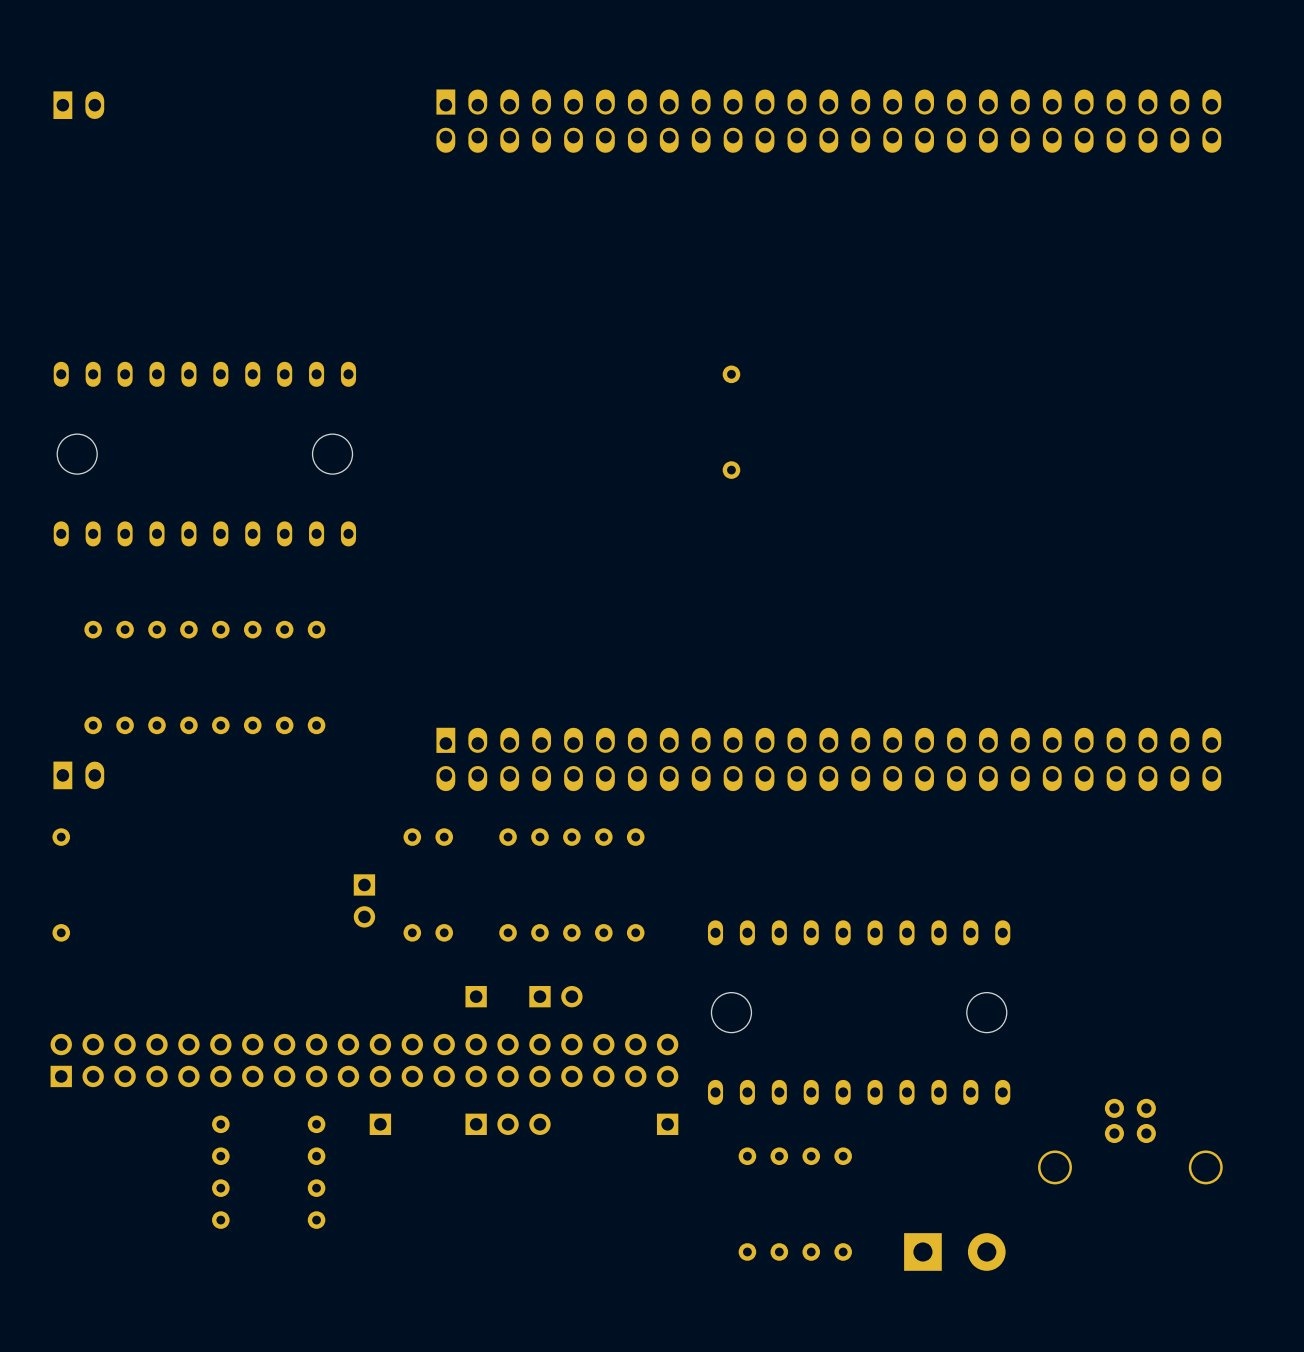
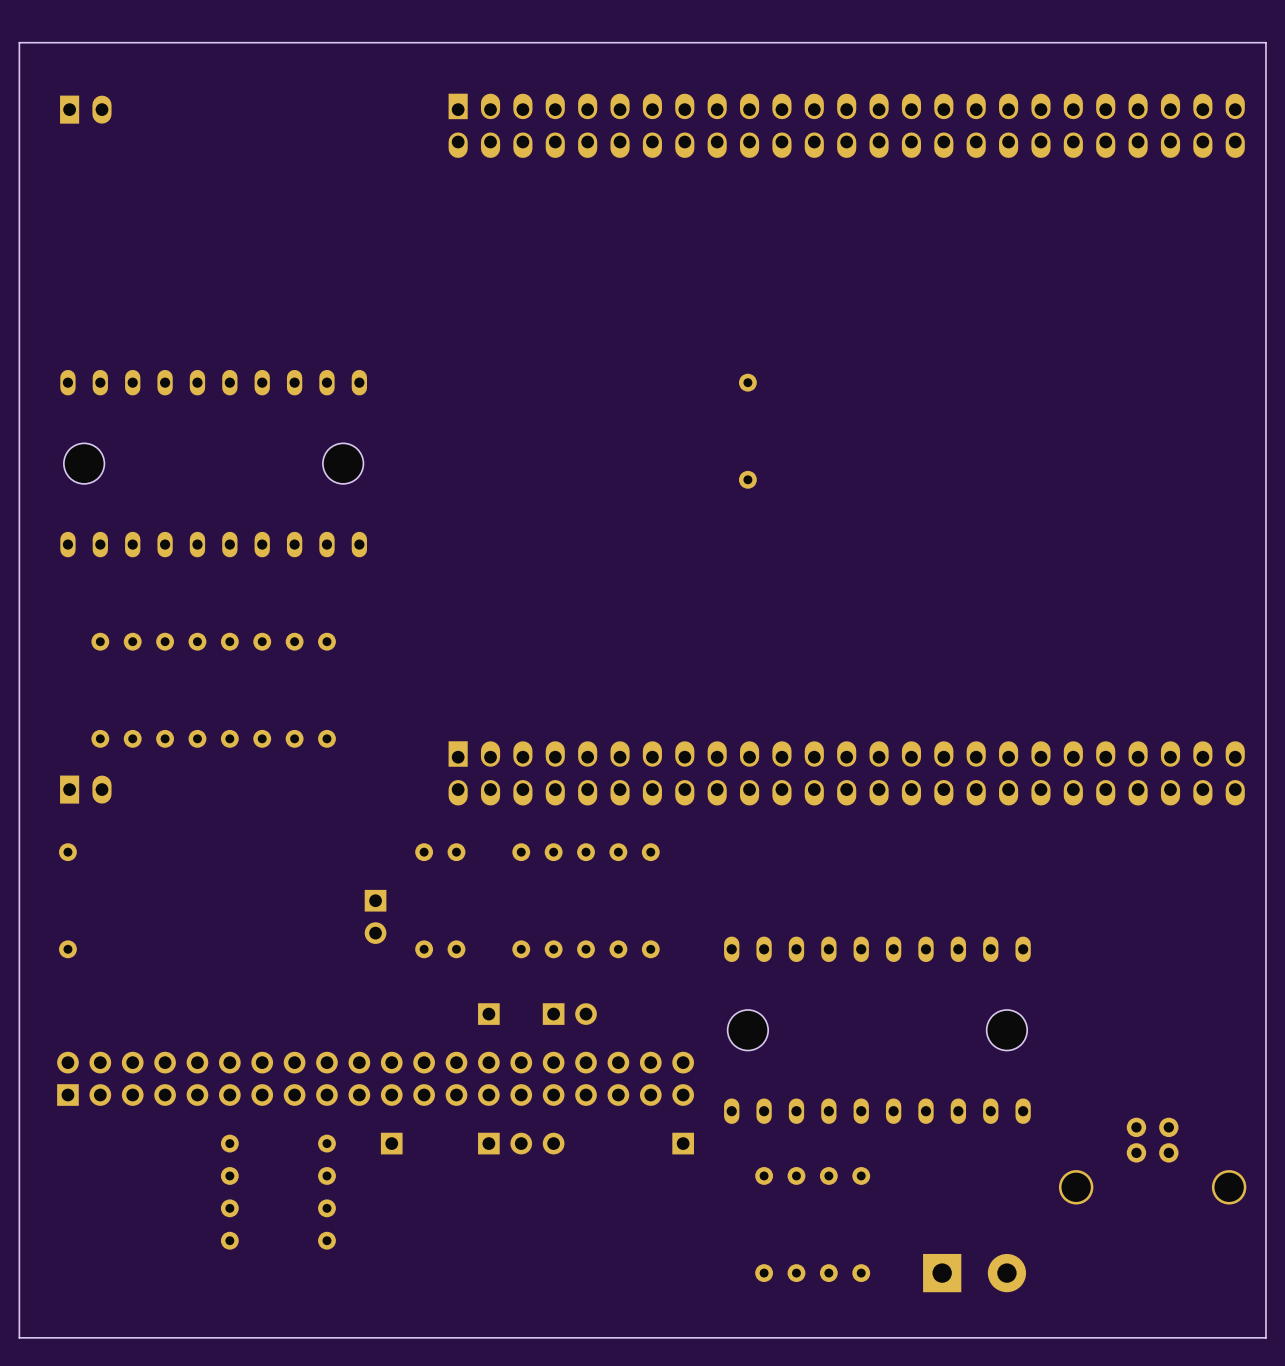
board edge: none -> (1265, 42) (1265, 1337) (19, 1337) (19, 42) (1265, 42)

